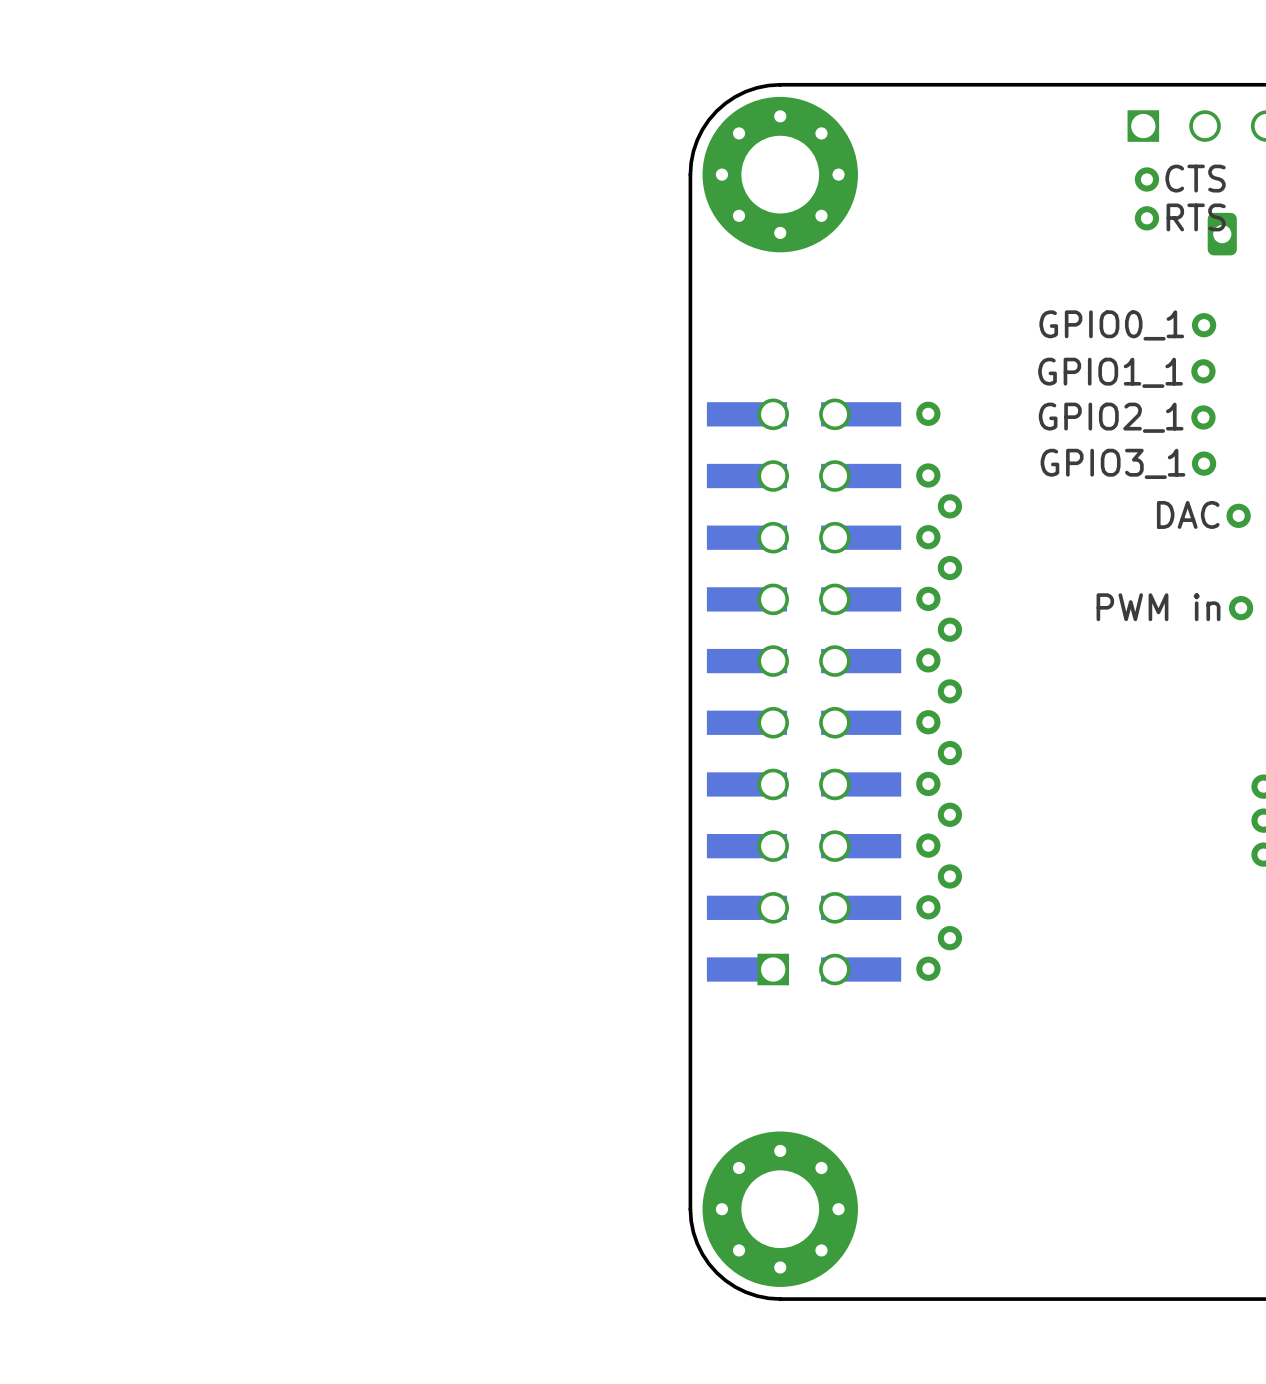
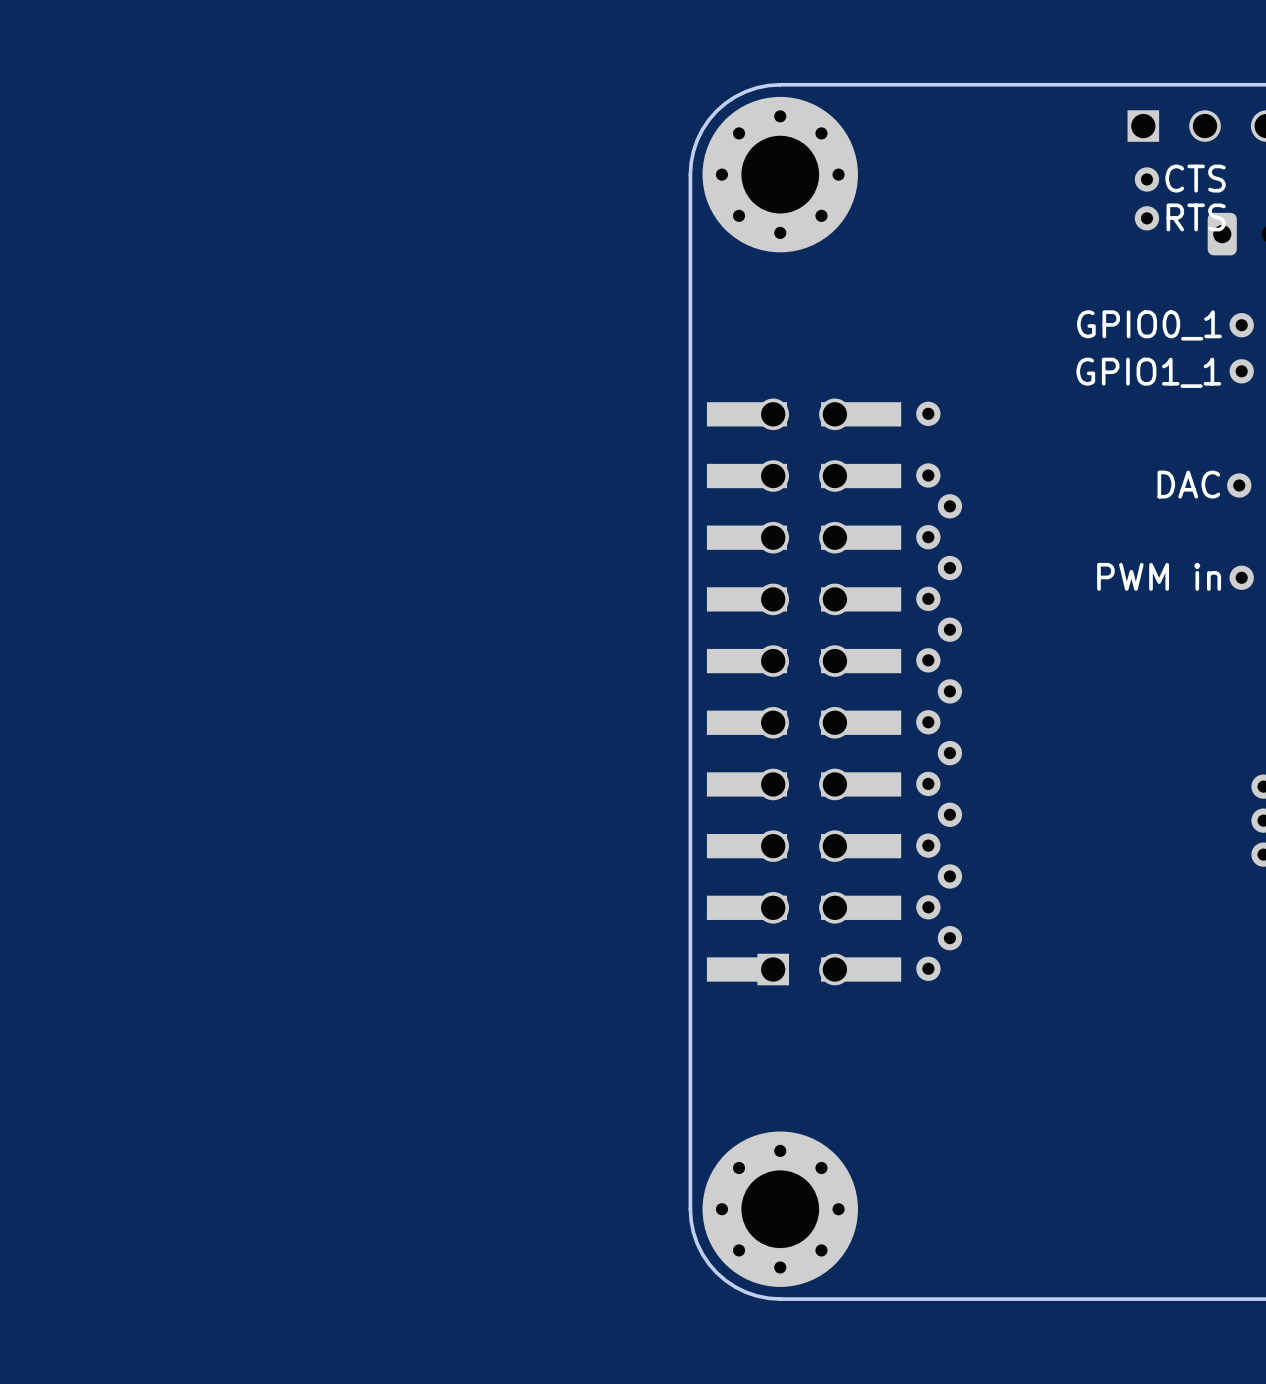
part position: (1204, 325) -> (1241, 325)
part position: (1203, 371) -> (1241, 371)
part: GPIO2_1 (1203, 417) -> none
part: GPIO3_1 (1204, 463) -> none
part position: (1238, 515) -> (1239, 485)
part position: (1241, 608) -> (1241, 577)

